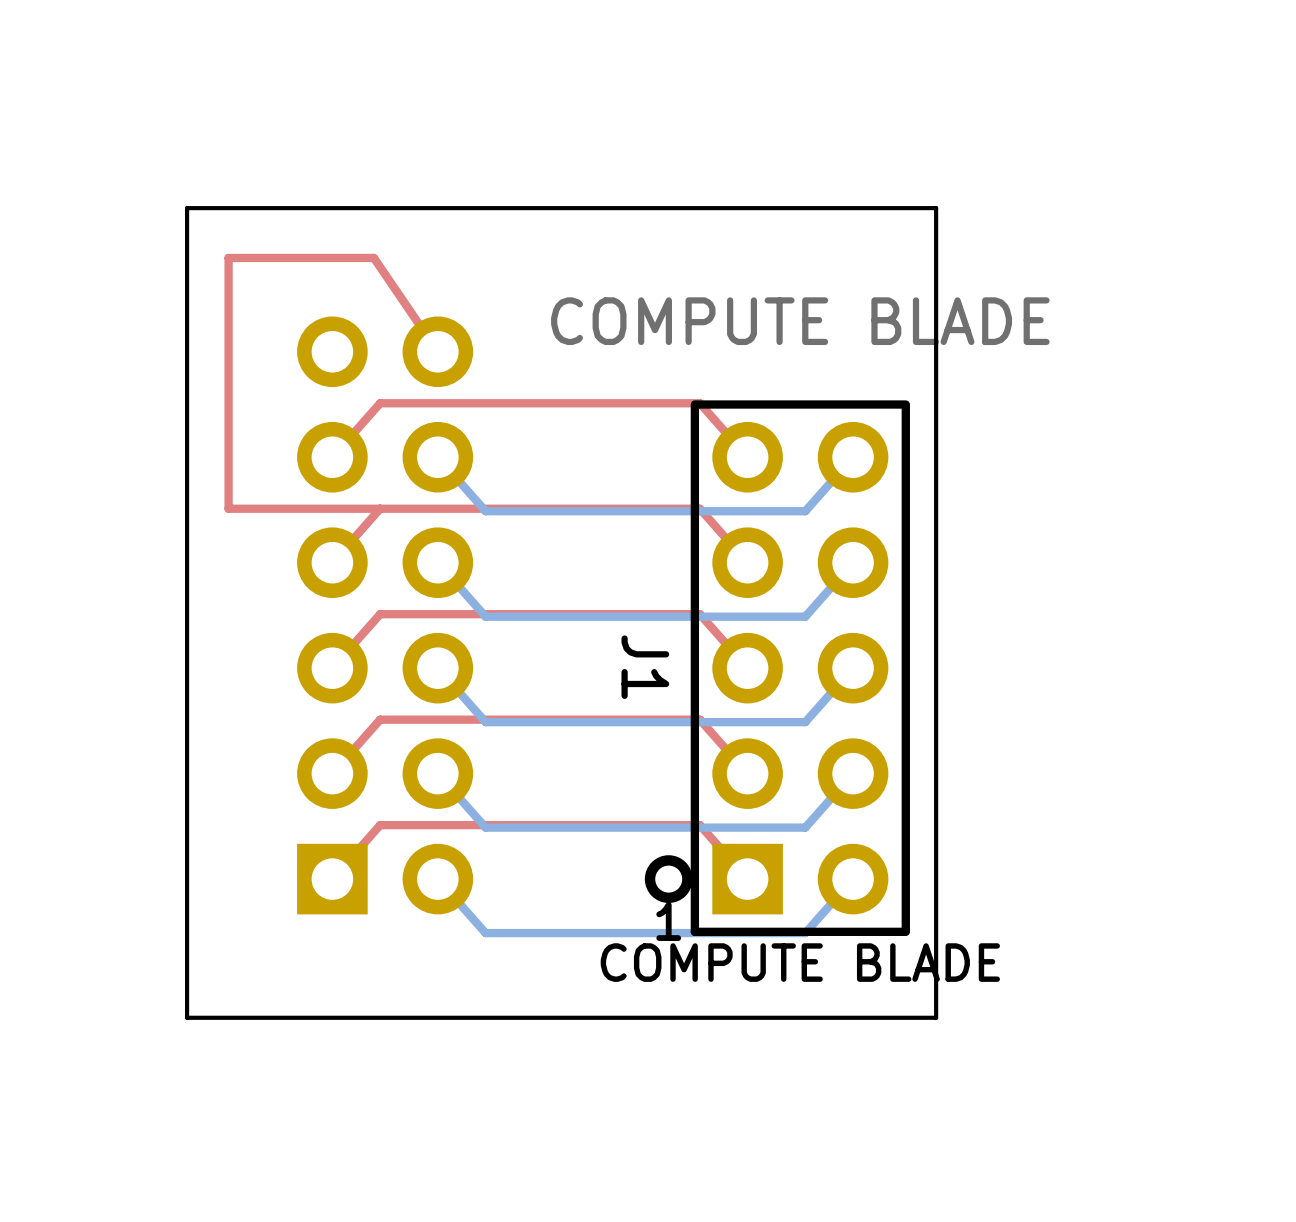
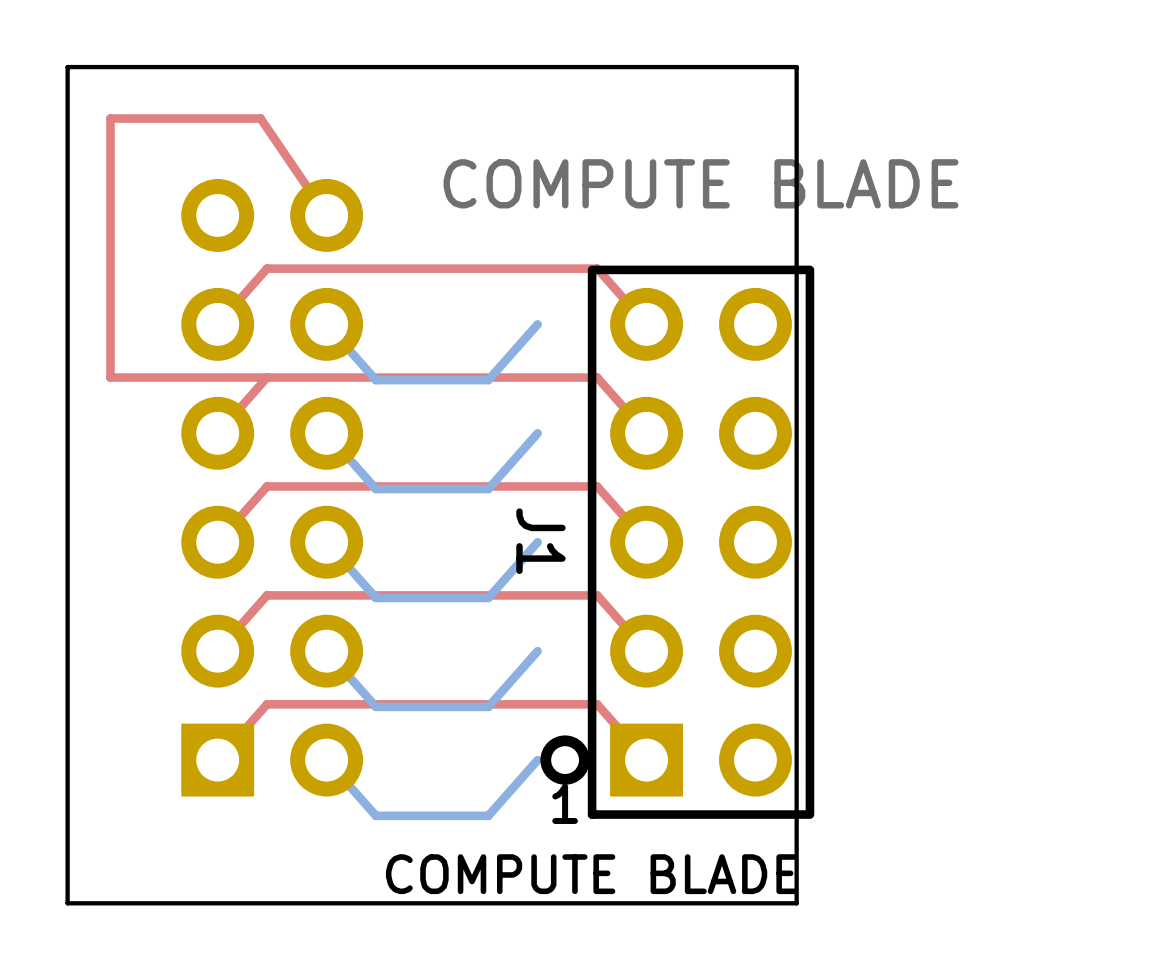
board edge: (892, 208) (936, 208) (936, 1017) (892, 1017) -> (796, 67) (796, 903)
bottom track: (853, 457) (805, 511) (594, 511) -> (537, 324) (488, 380)
bottom track: (853, 562) (805, 616) (594, 616) -> (537, 433) (488, 489)
bottom track: (853, 668) (805, 722) (594, 722) -> (537, 542) (488, 597)
bottom track: (853, 773) (805, 827) (594, 827) -> (537, 651) (488, 706)
bottom track: (853, 879) (805, 933) (594, 933) -> (537, 760) (488, 815)
text position: COMPUTE BLADE (800, 962) -> COMPUTE BLADE (592, 874)

